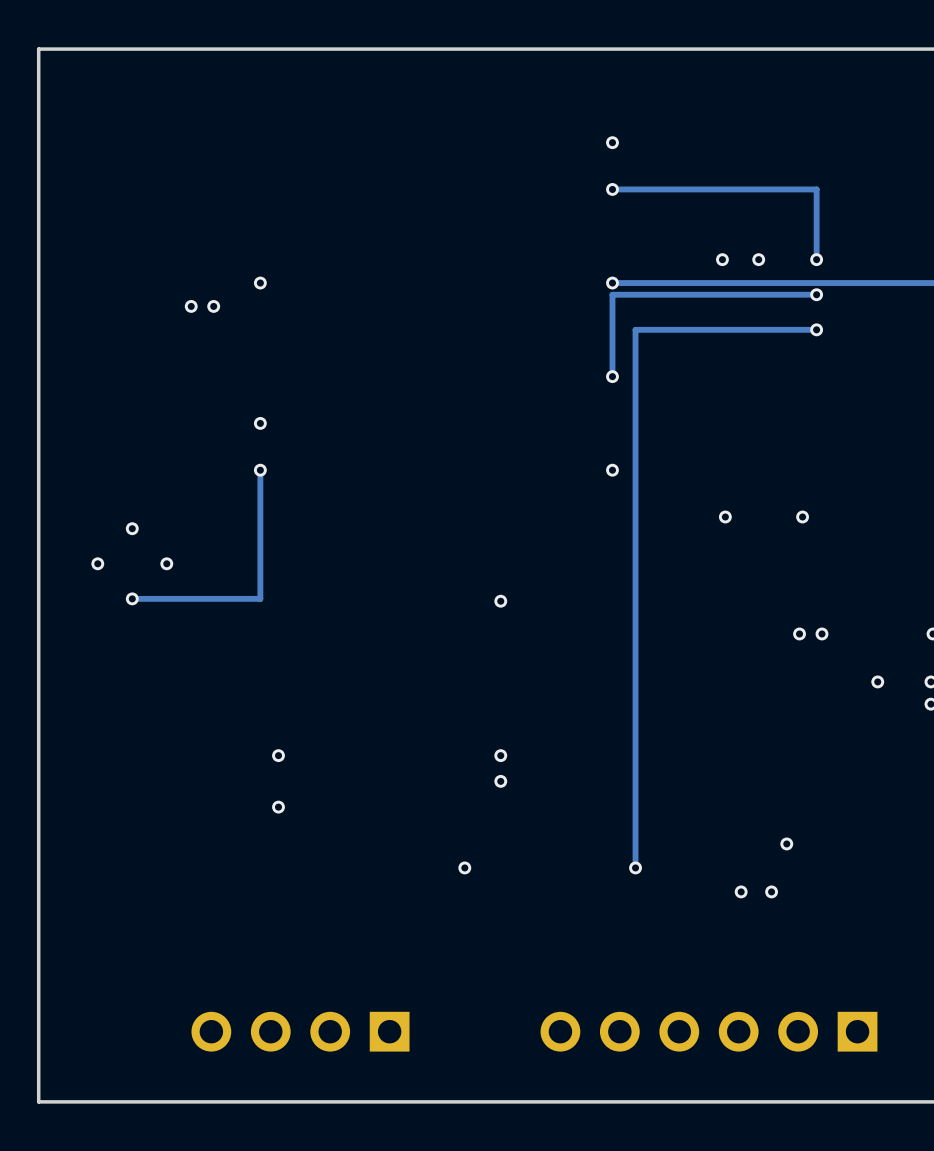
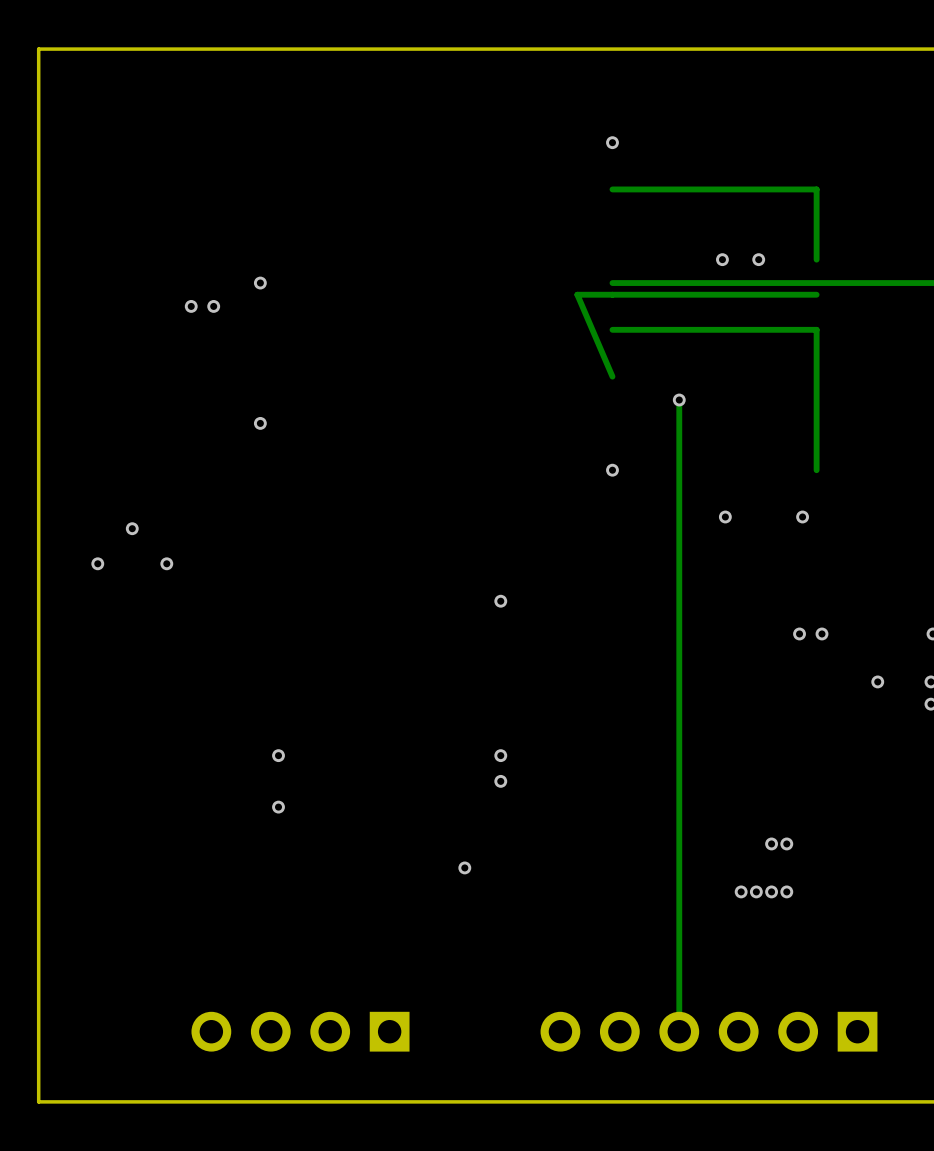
via: (612, 189) -> none
via: (816, 259) -> none
via: (612, 283) -> none
track: (612, 294) (612, 376) -> (612, 294) (577, 294) (612, 376)
via: (816, 294) -> none
track: (635, 329) (635, 867) -> (635, 329) (612, 329)
track: none -> (816, 329) (816, 470)
via: (816, 329) -> none
via: (612, 376) -> none
track: none -> (679, 400) (679, 1031)
via: none -> (679, 400)
track: (260, 470) (260, 598) (132, 598) -> none
via: (260, 470) -> none
via: (132, 598) -> none
via: none -> (771, 843)
via: (635, 867) -> none
via: none -> (756, 891)
via: none -> (786, 891)

